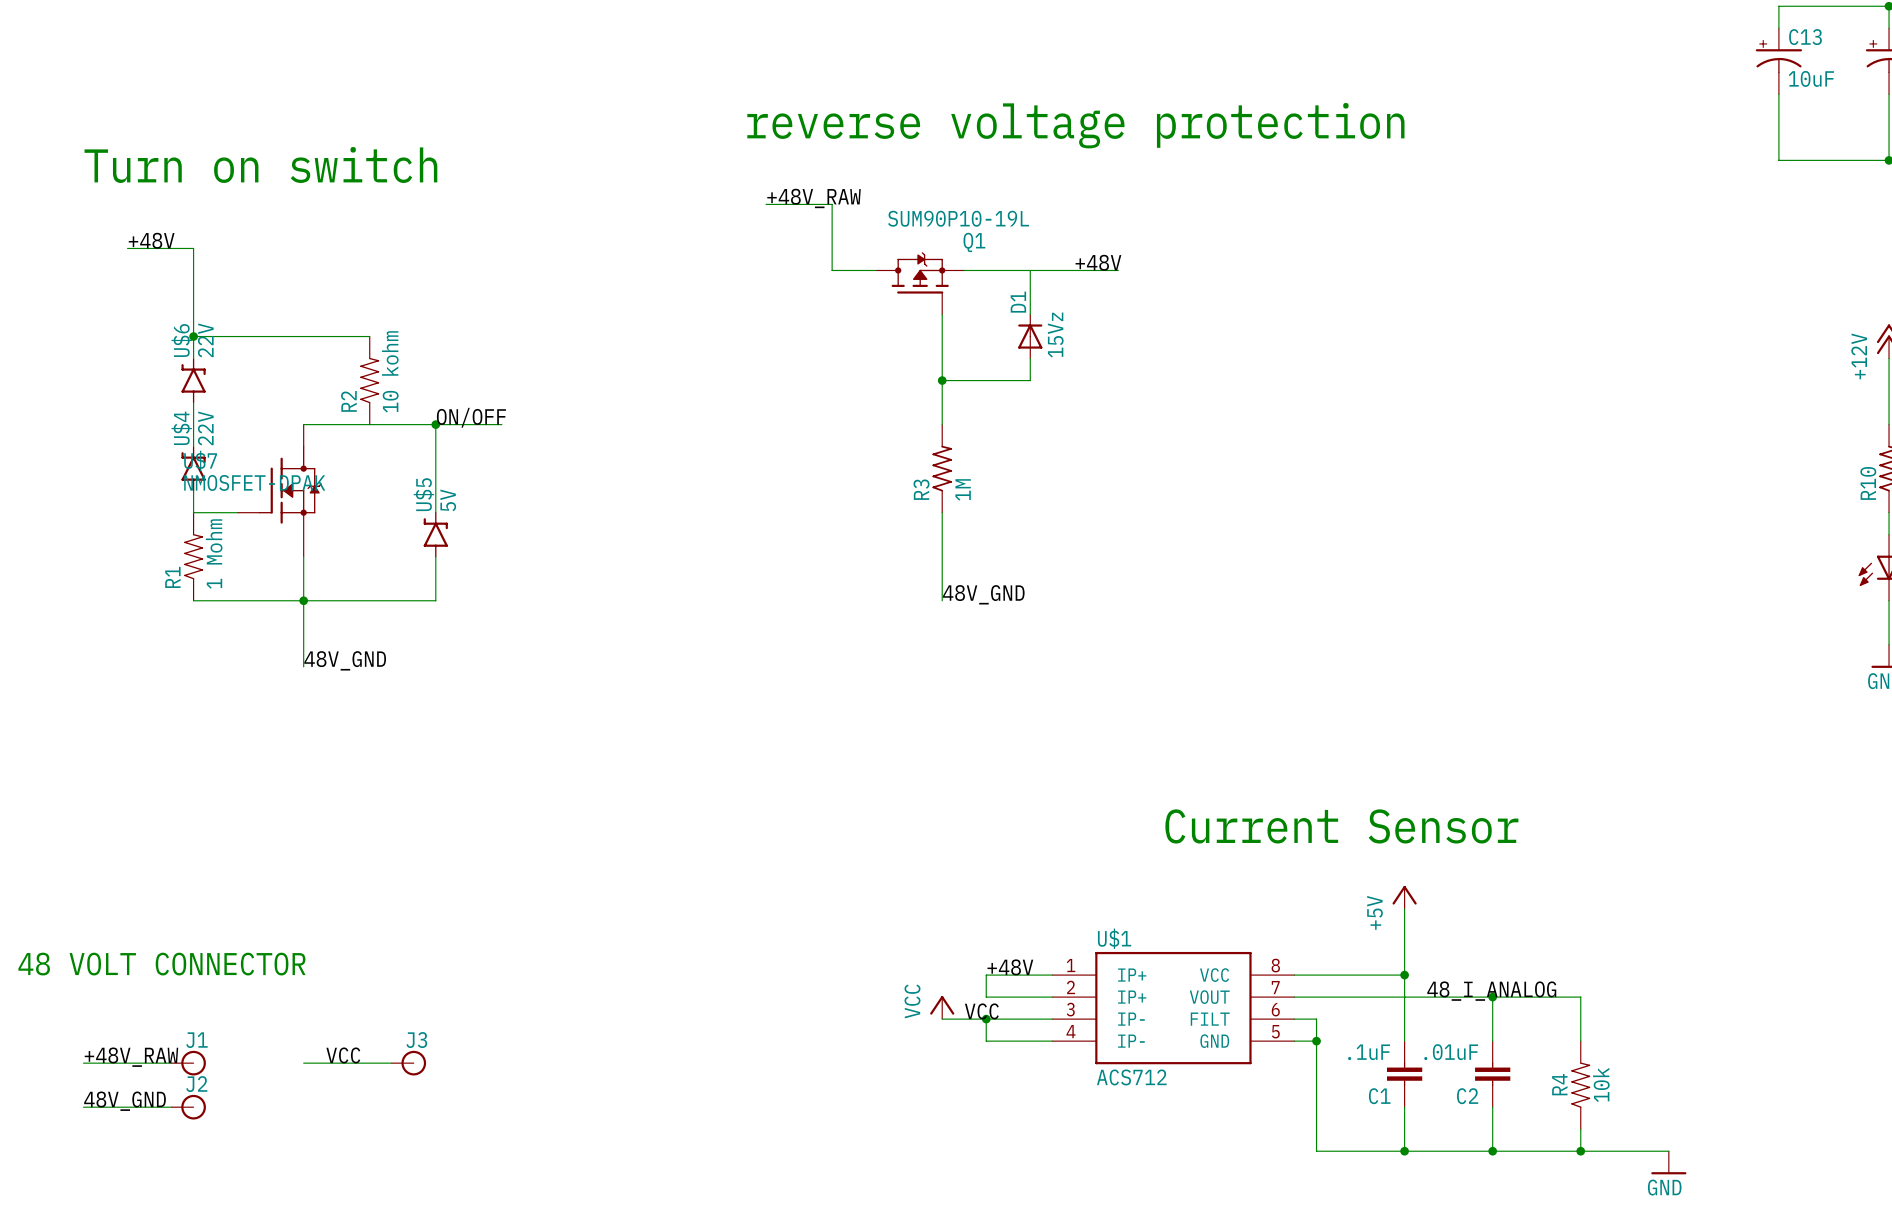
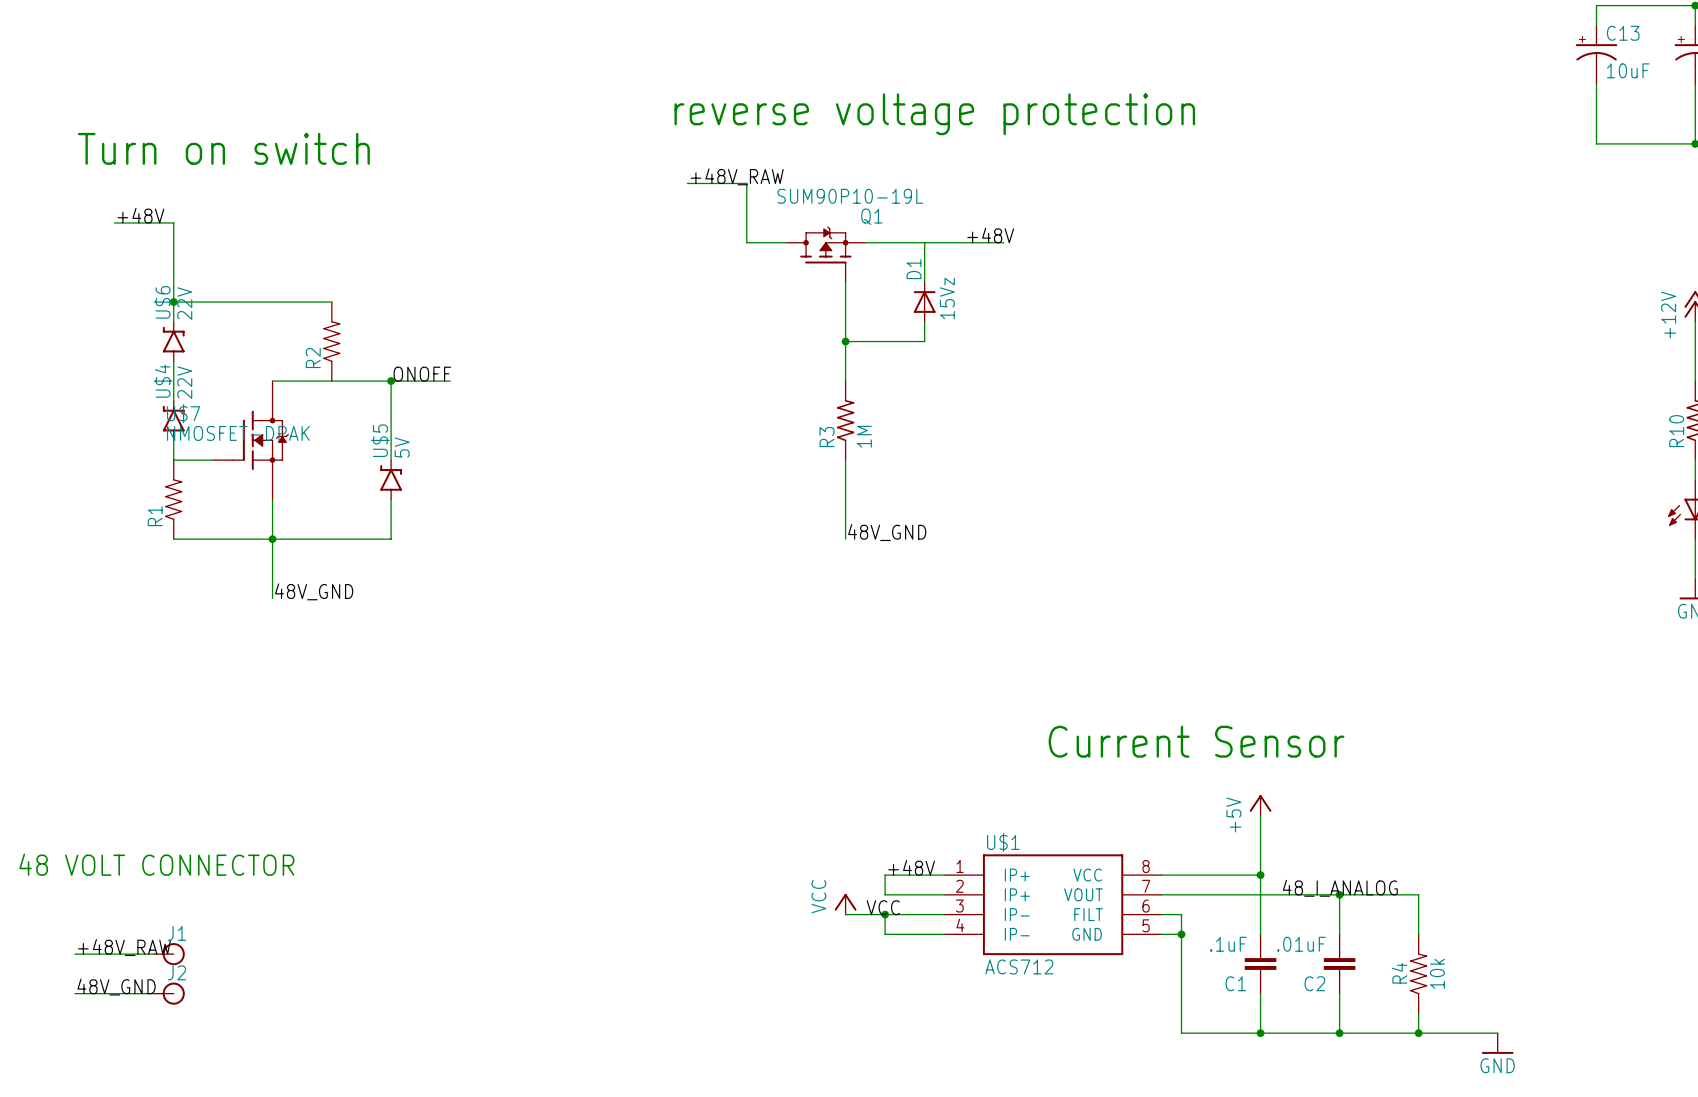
R2 value: 10 kohm (390, 371) -> none
label: ON/OFF (471, 417) -> ONOFF (422, 374)
R1 value: 1 Mohm (214, 553) -> none
label: VCC (343, 1055) -> none
wire: (303, 1063) (391, 1063) -> none
J3: (408, 1063) -> none

